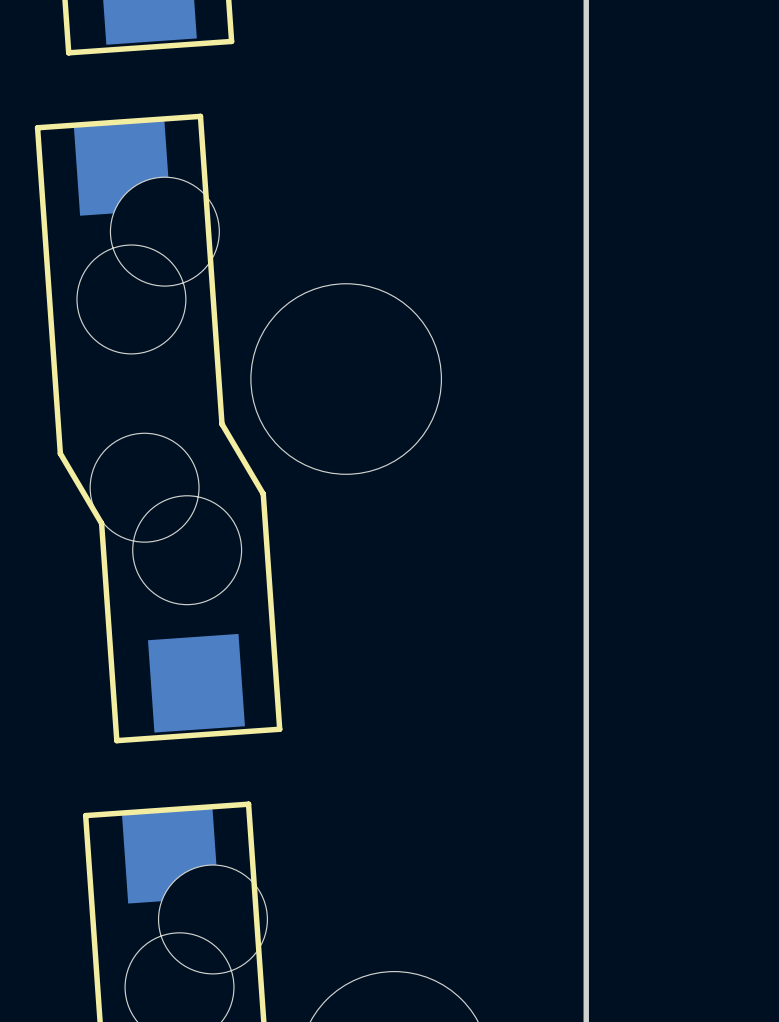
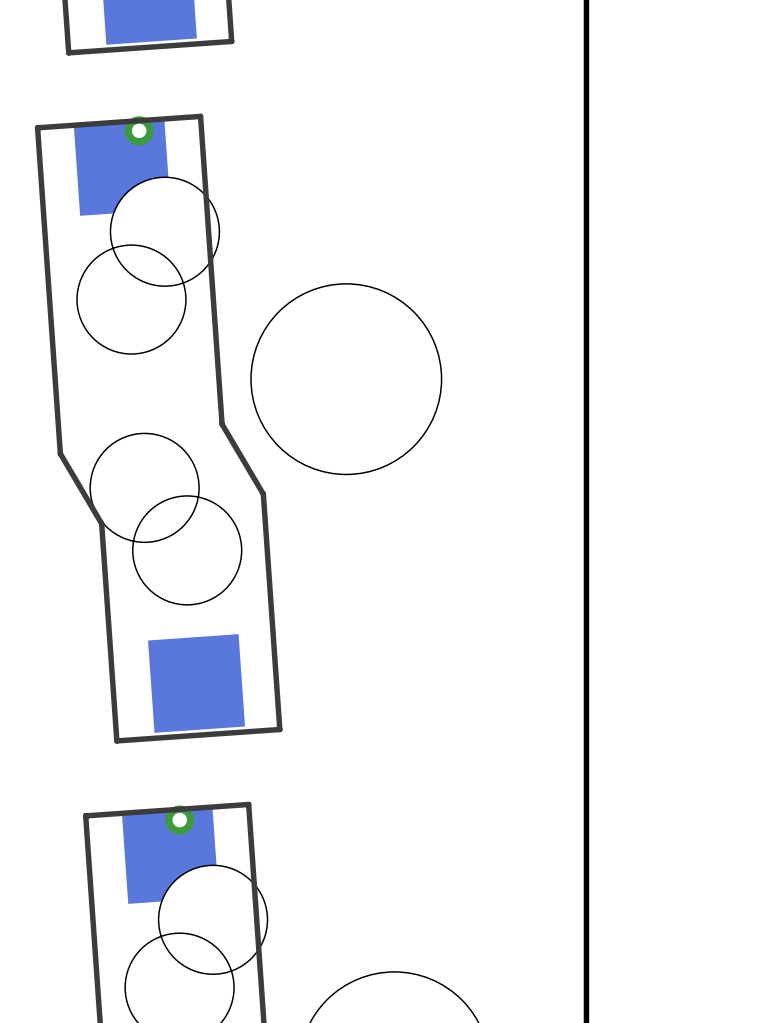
via: none -> (139, 130)
via: none -> (179, 820)

